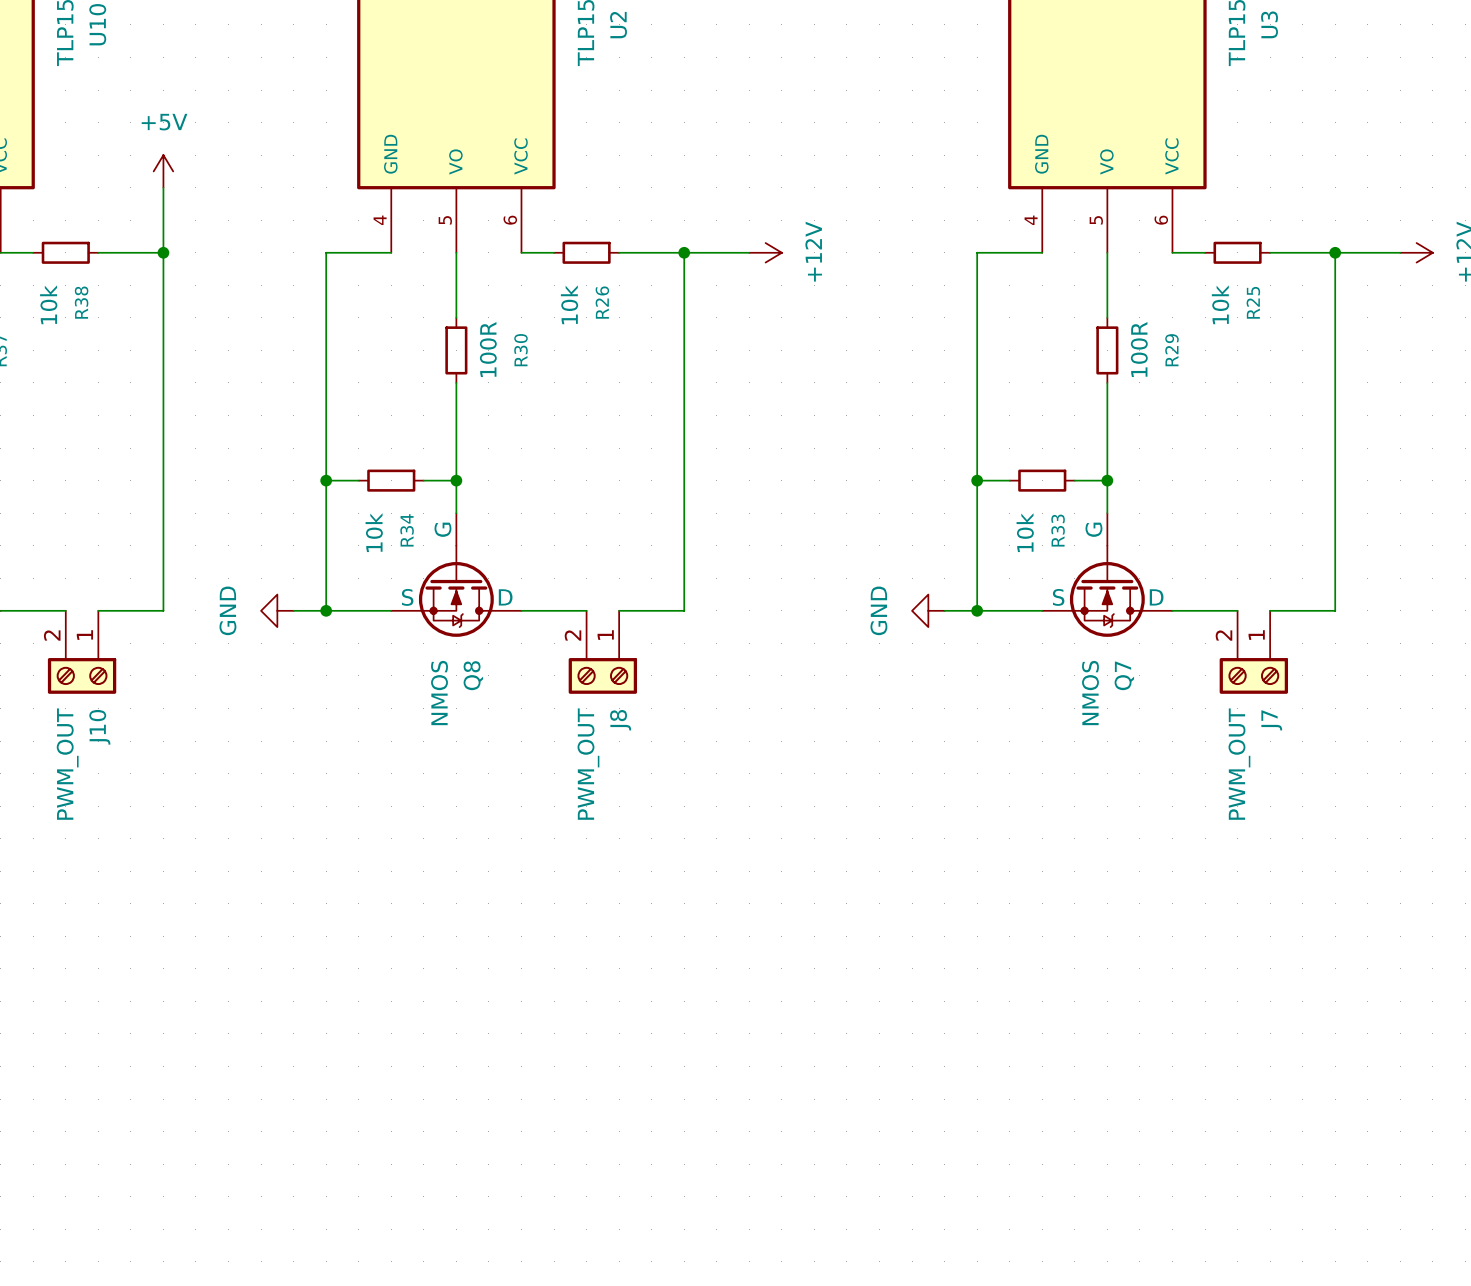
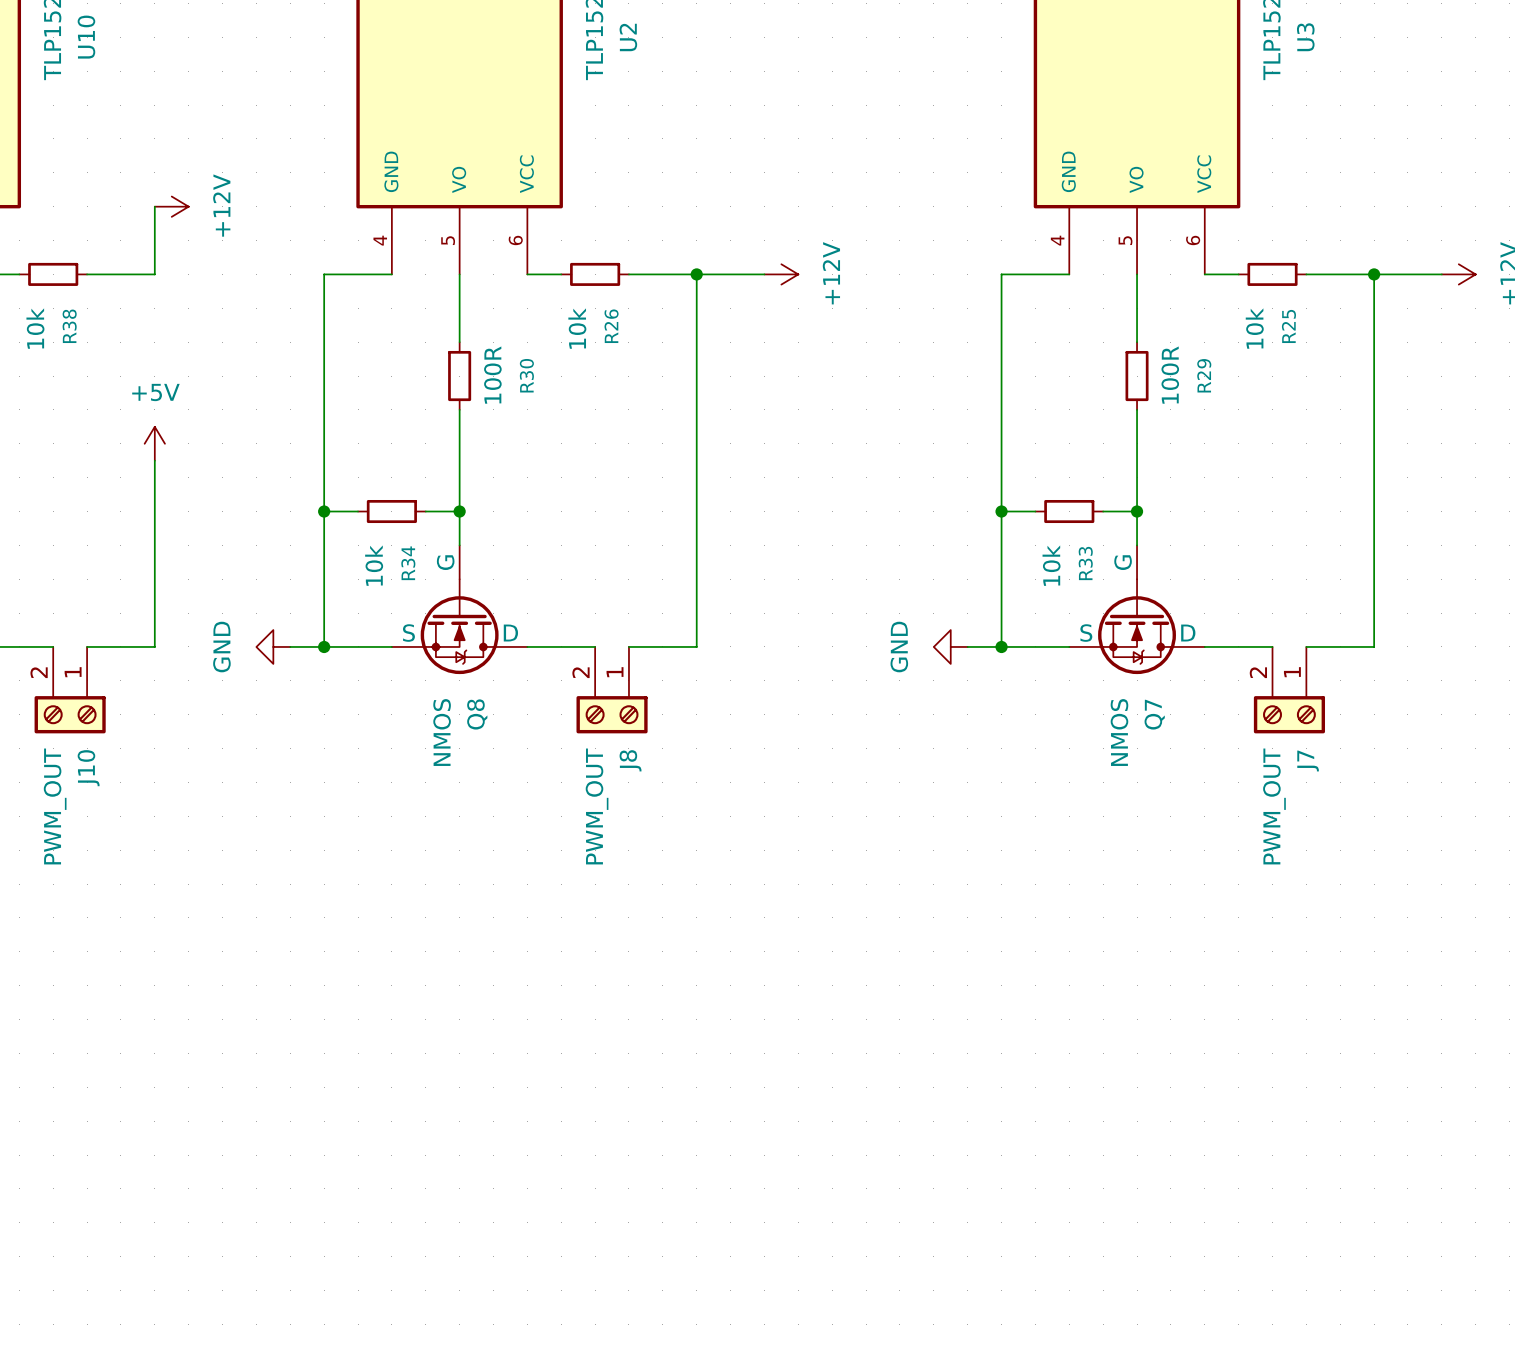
power symbol position: +5V (163, 171) -> +5V (154, 443)
power symbol: none -> +12V (171, 206)
wire: (163, 252) (163, 431) -> none
junction: (163, 252) -> none

